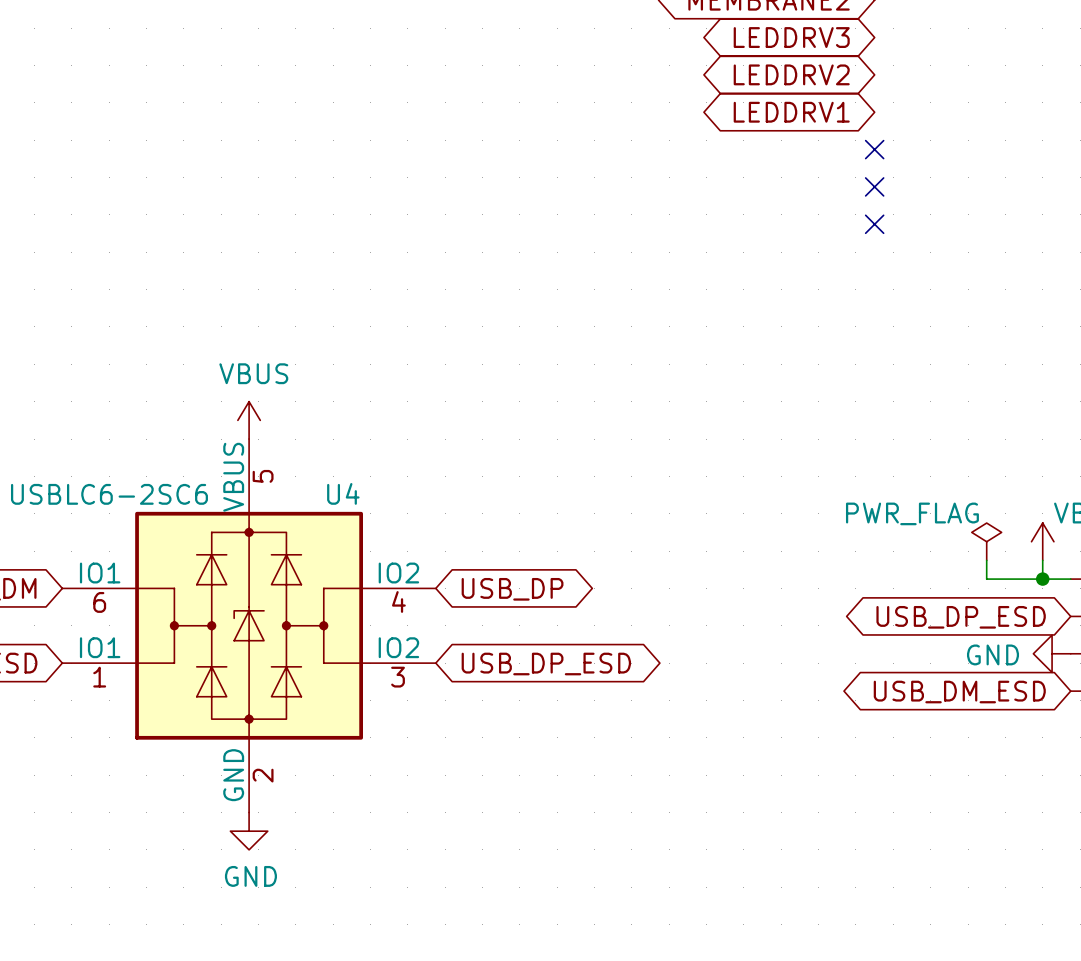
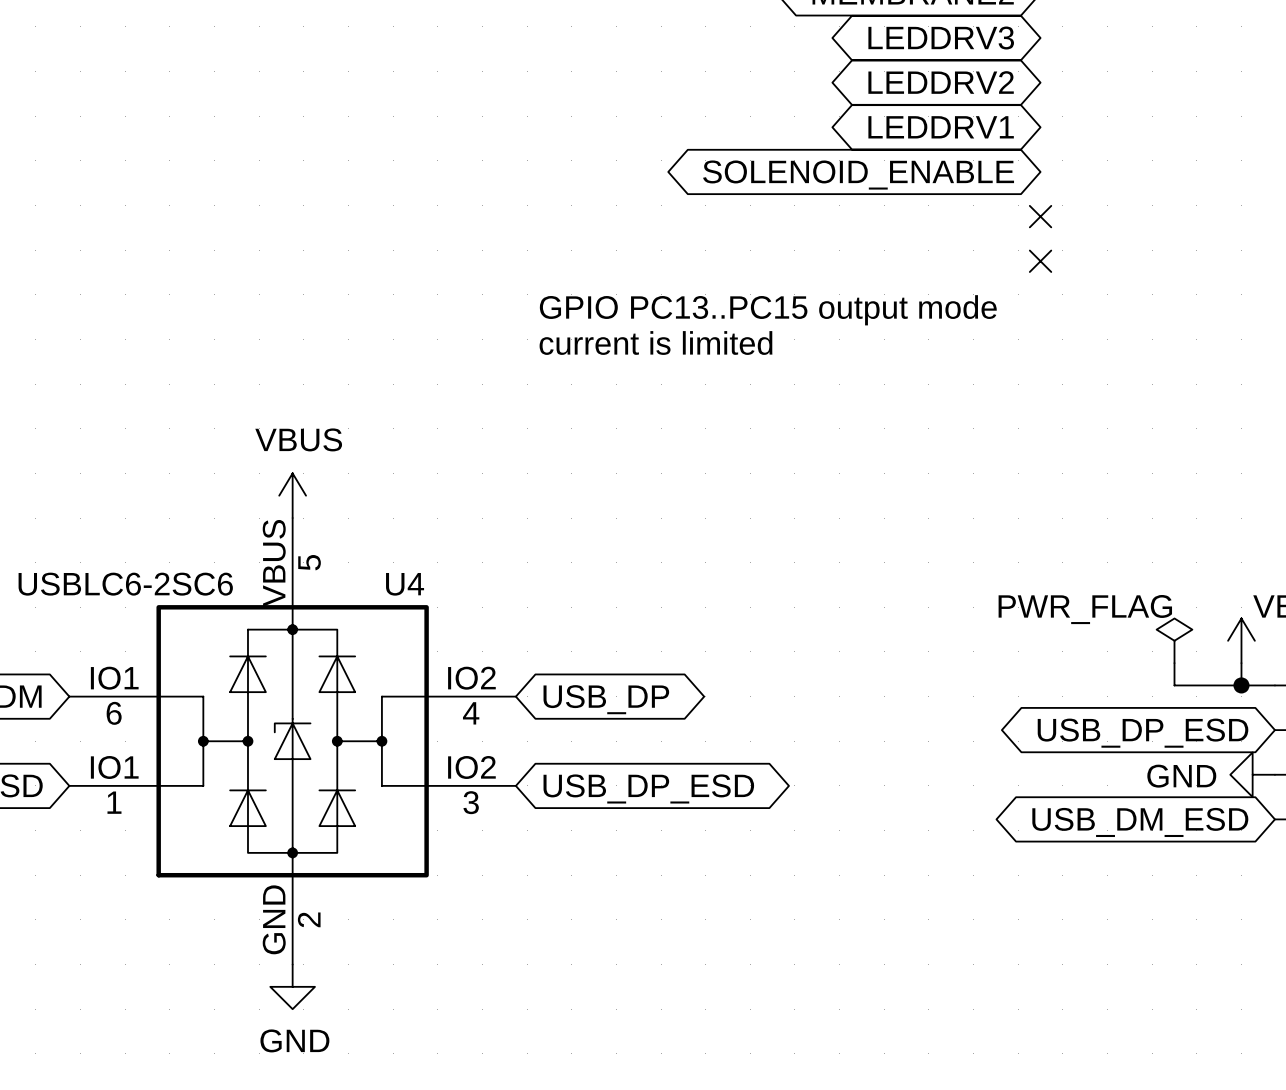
no-connect mark: (874, 149) -> none
global label: none -> SOLENOID_ENABLE (858, 175)
text: none -> GPIO PC13..PC15 output mode (768, 310)
text: none -> current is limited (655, 343)

